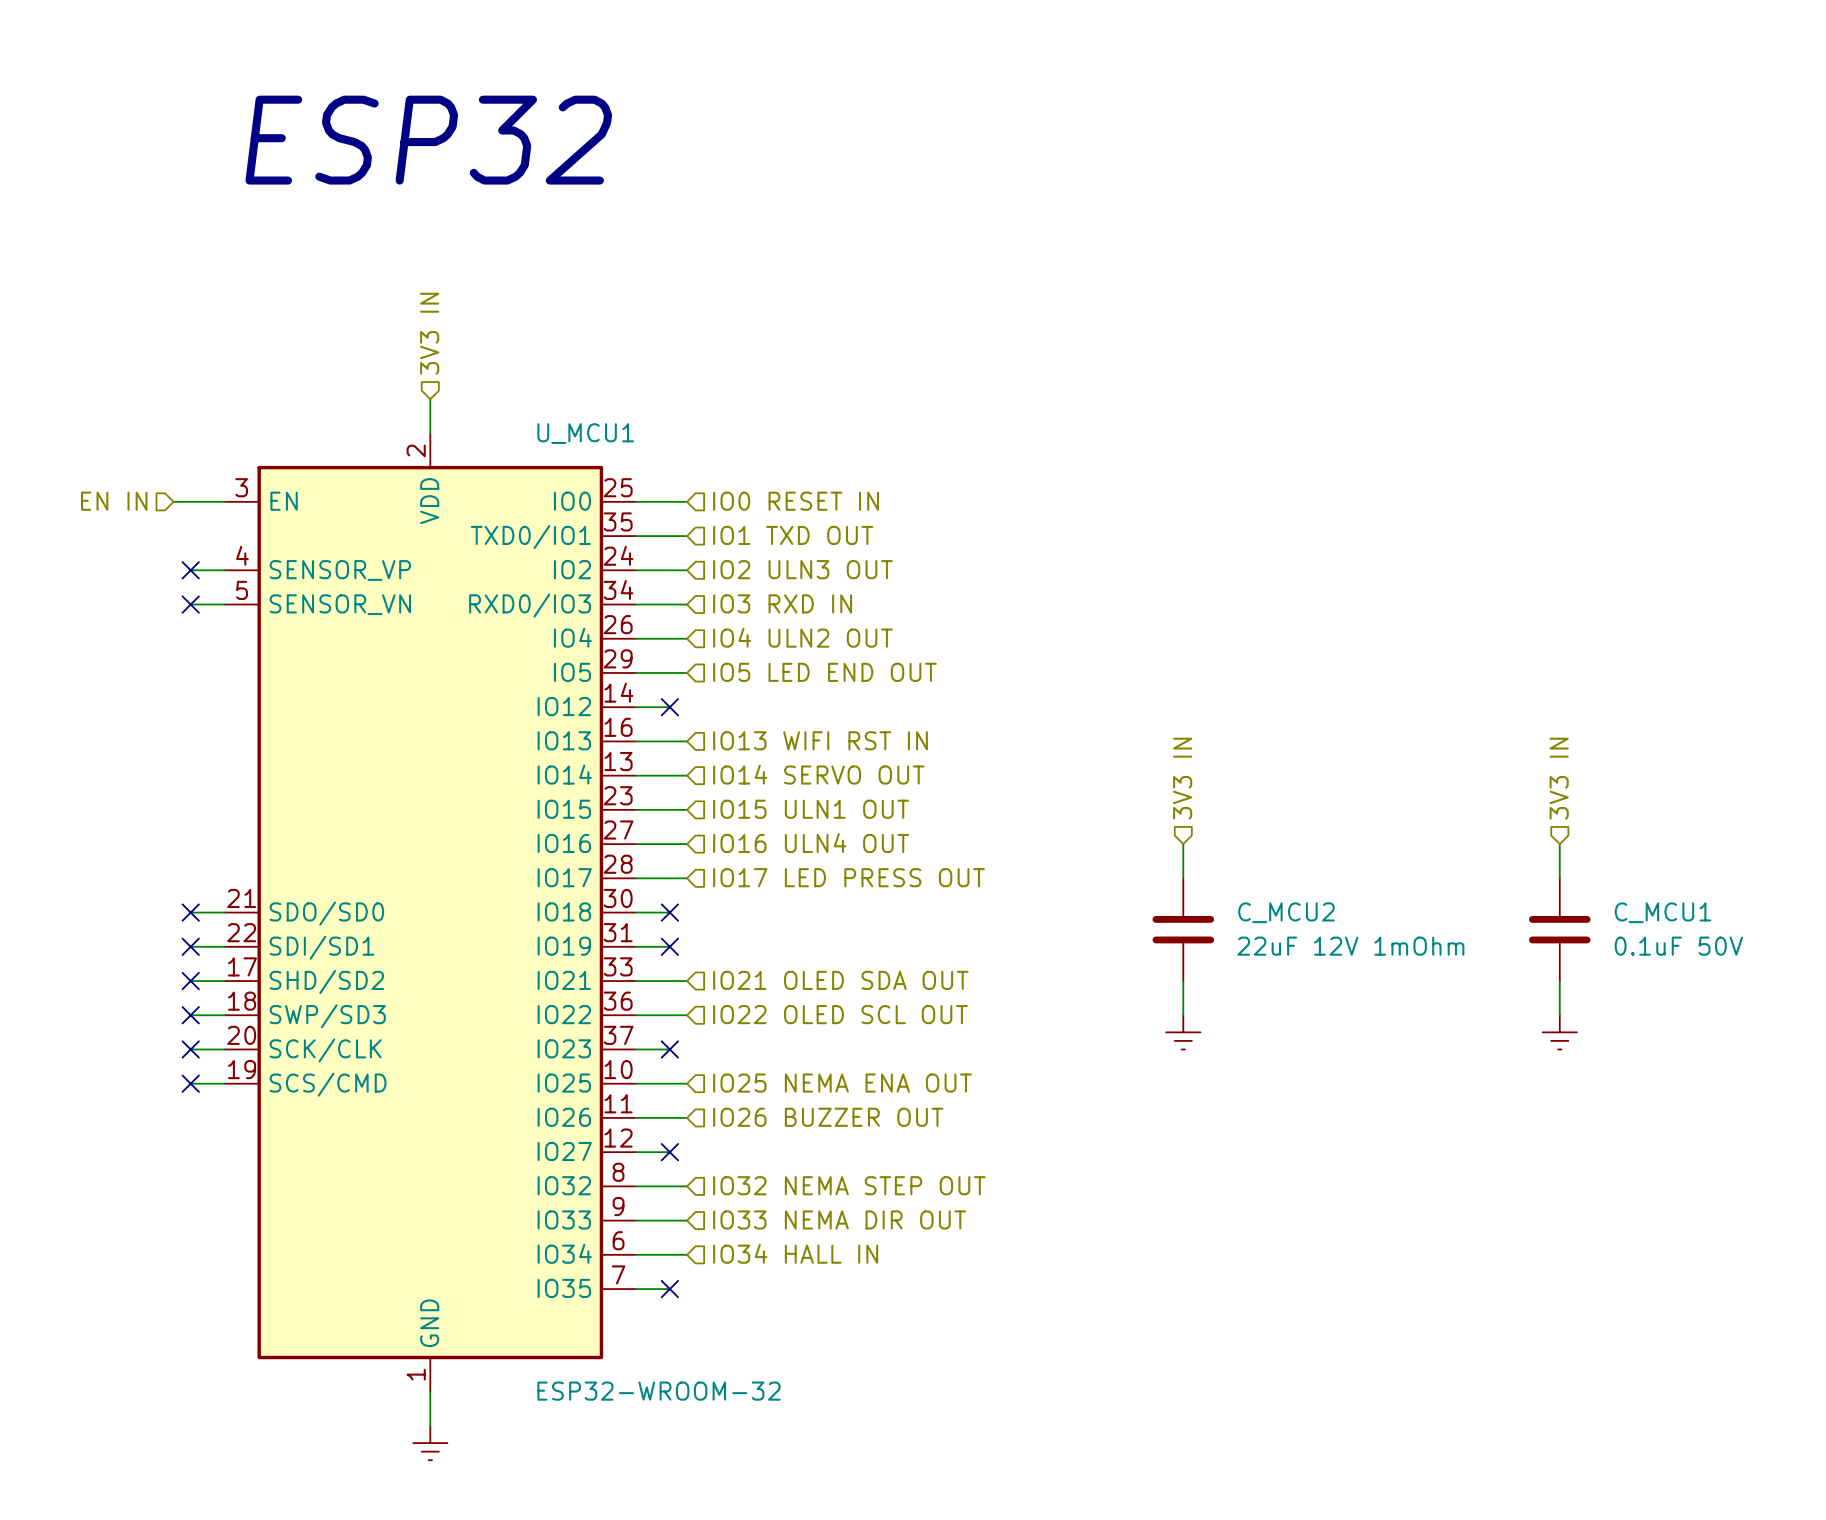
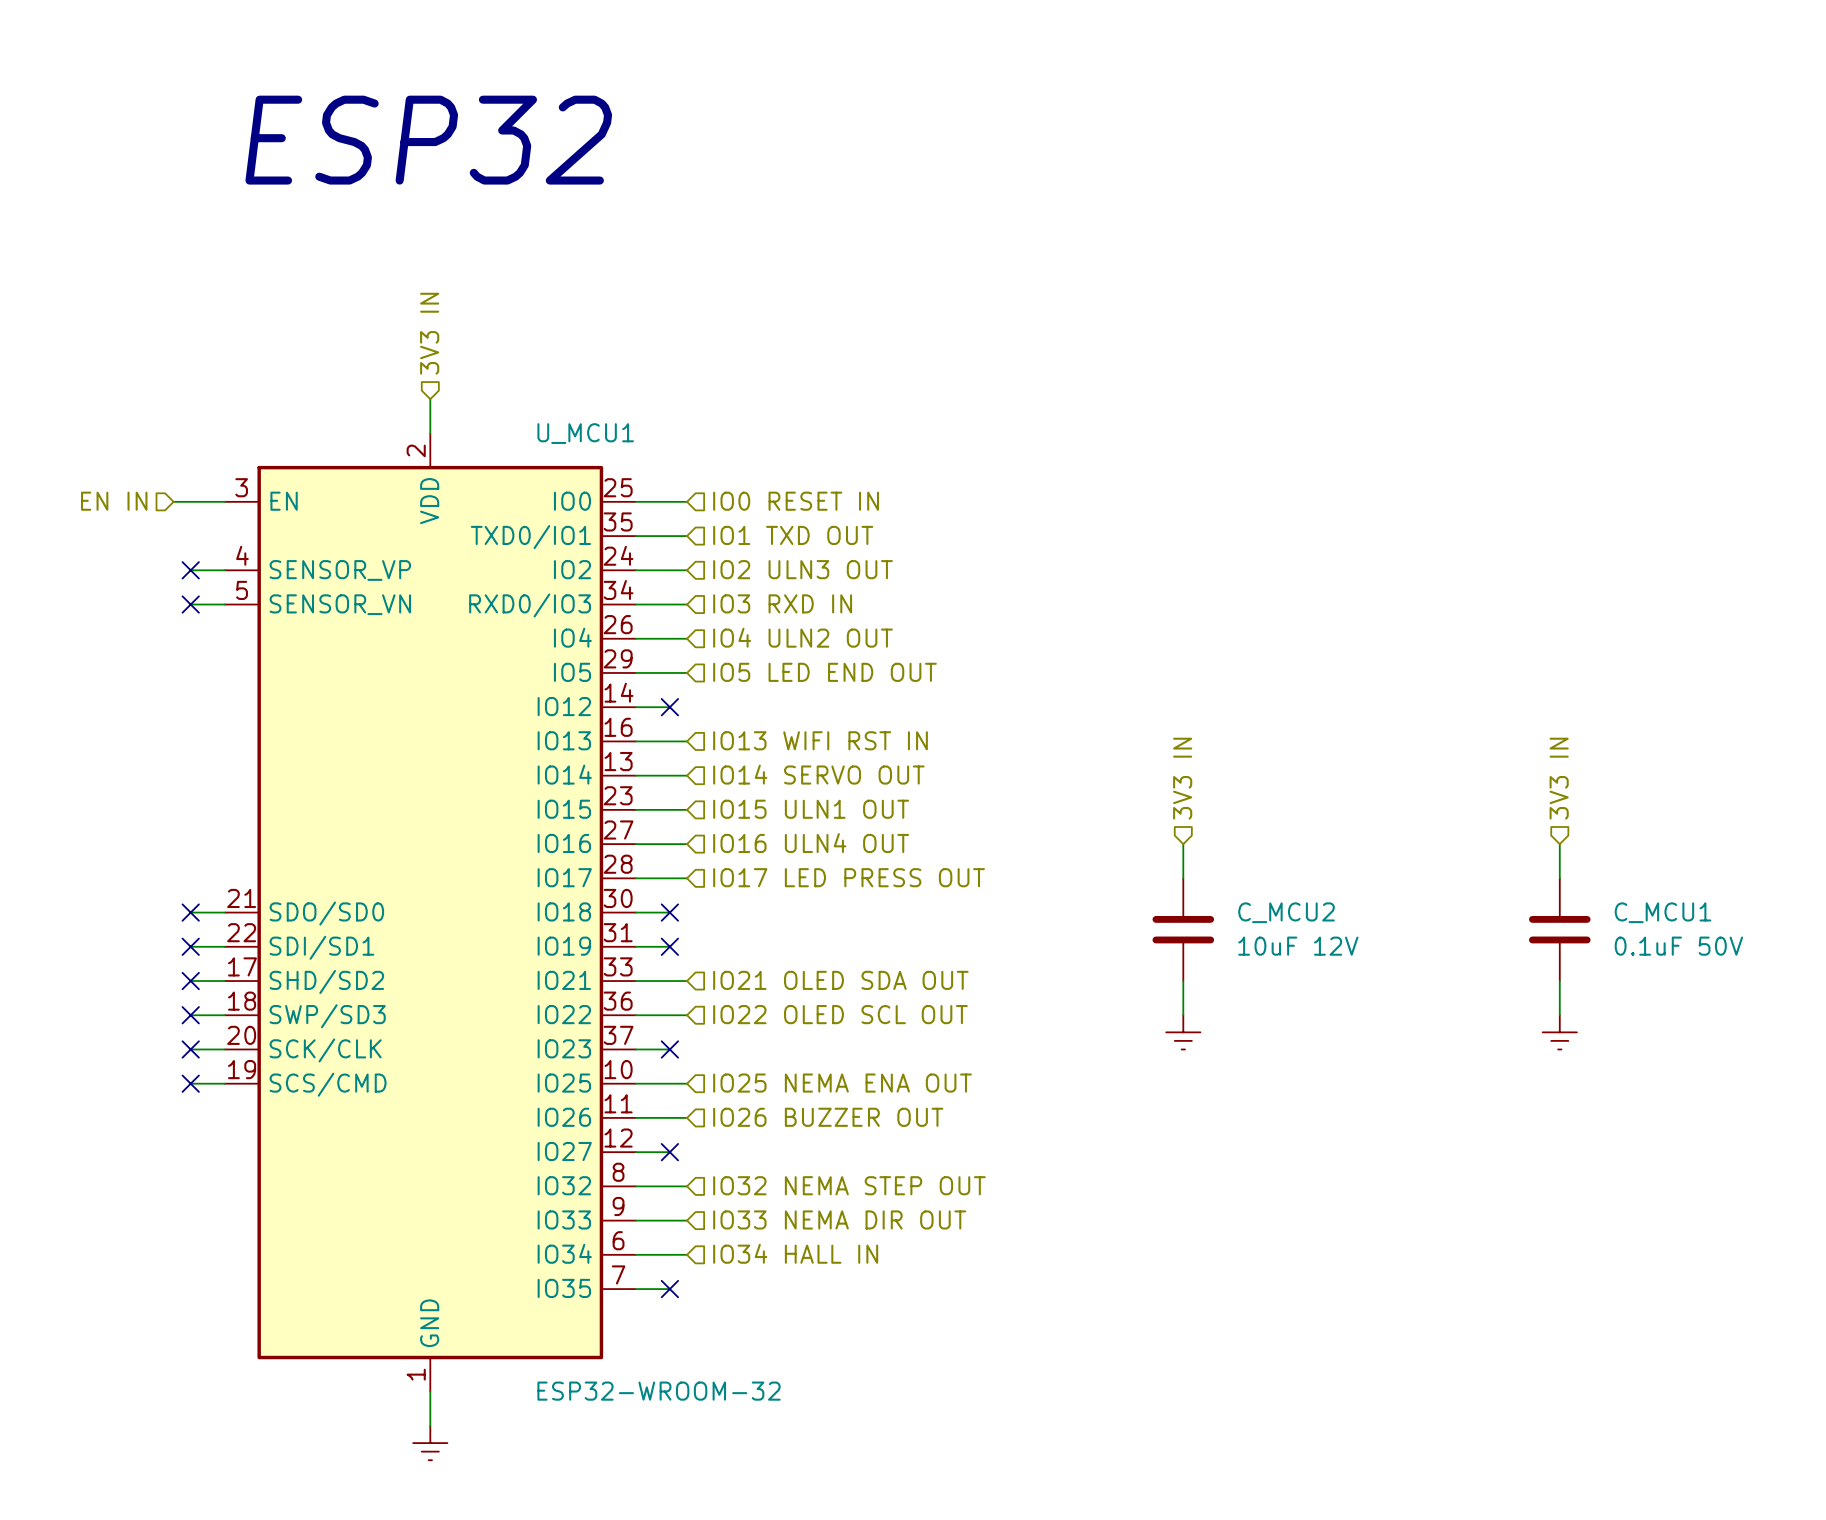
C_MCU2 value: 22uF 12V 1mOhm (1350, 946) -> 10uF 12V (1298, 946)

